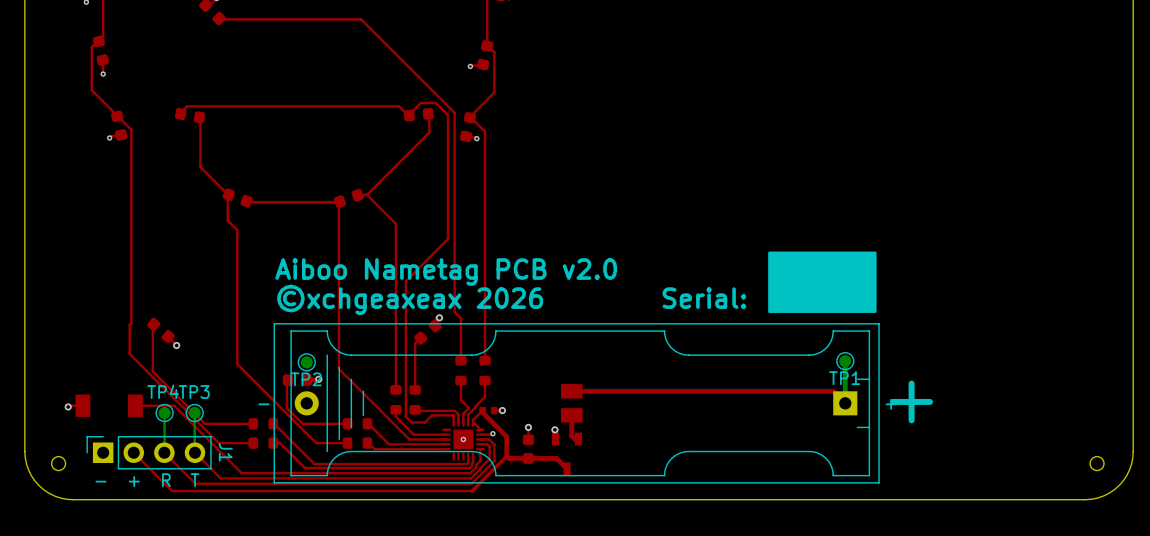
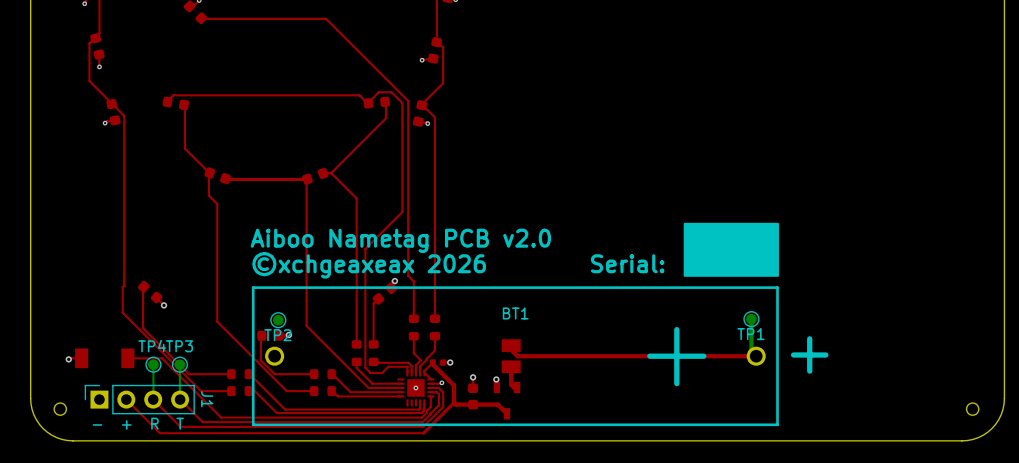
top track: (571, 391) (833, 391) (845, 403) -> none
top track: none -> (511, 349) (517, 356) (753, 356)
part: (576, 403) -> none
BT1: none -> (515, 356)

